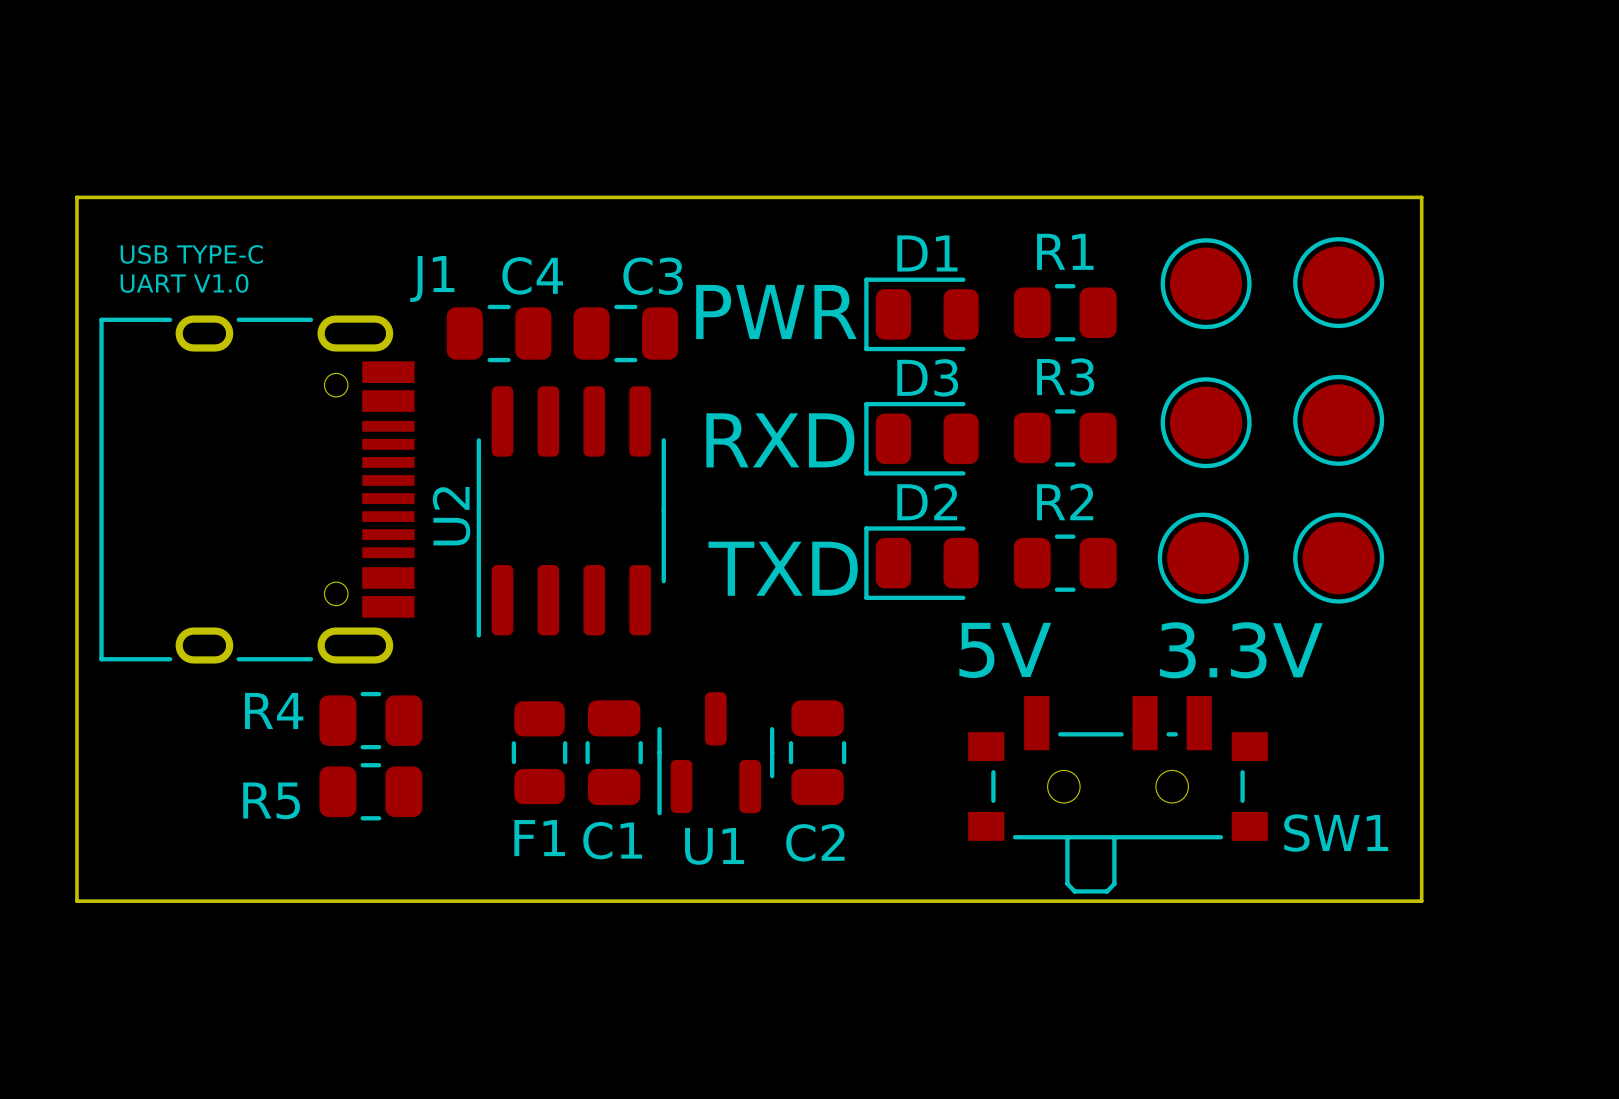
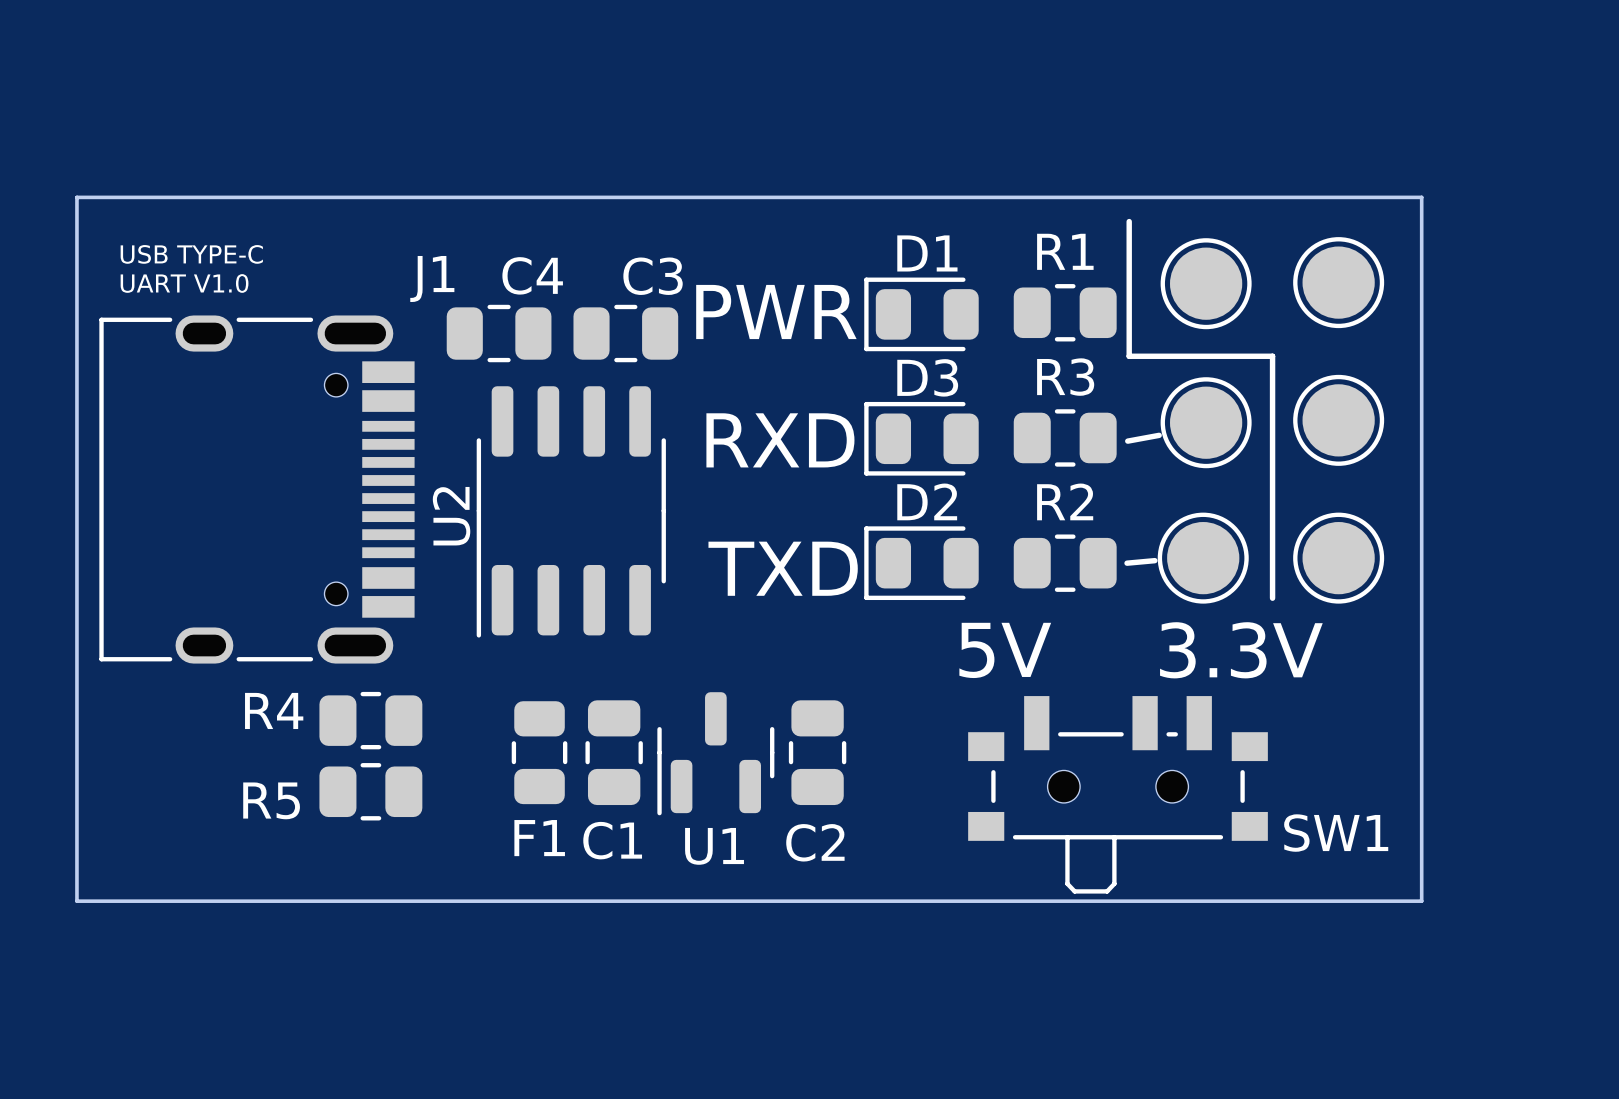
line: none -> (1129, 221) (1129, 356) (1272, 356) (1272, 598)
line: none -> (1159, 435) (1127, 441)
line: none -> (1154, 560) (1127, 563)

